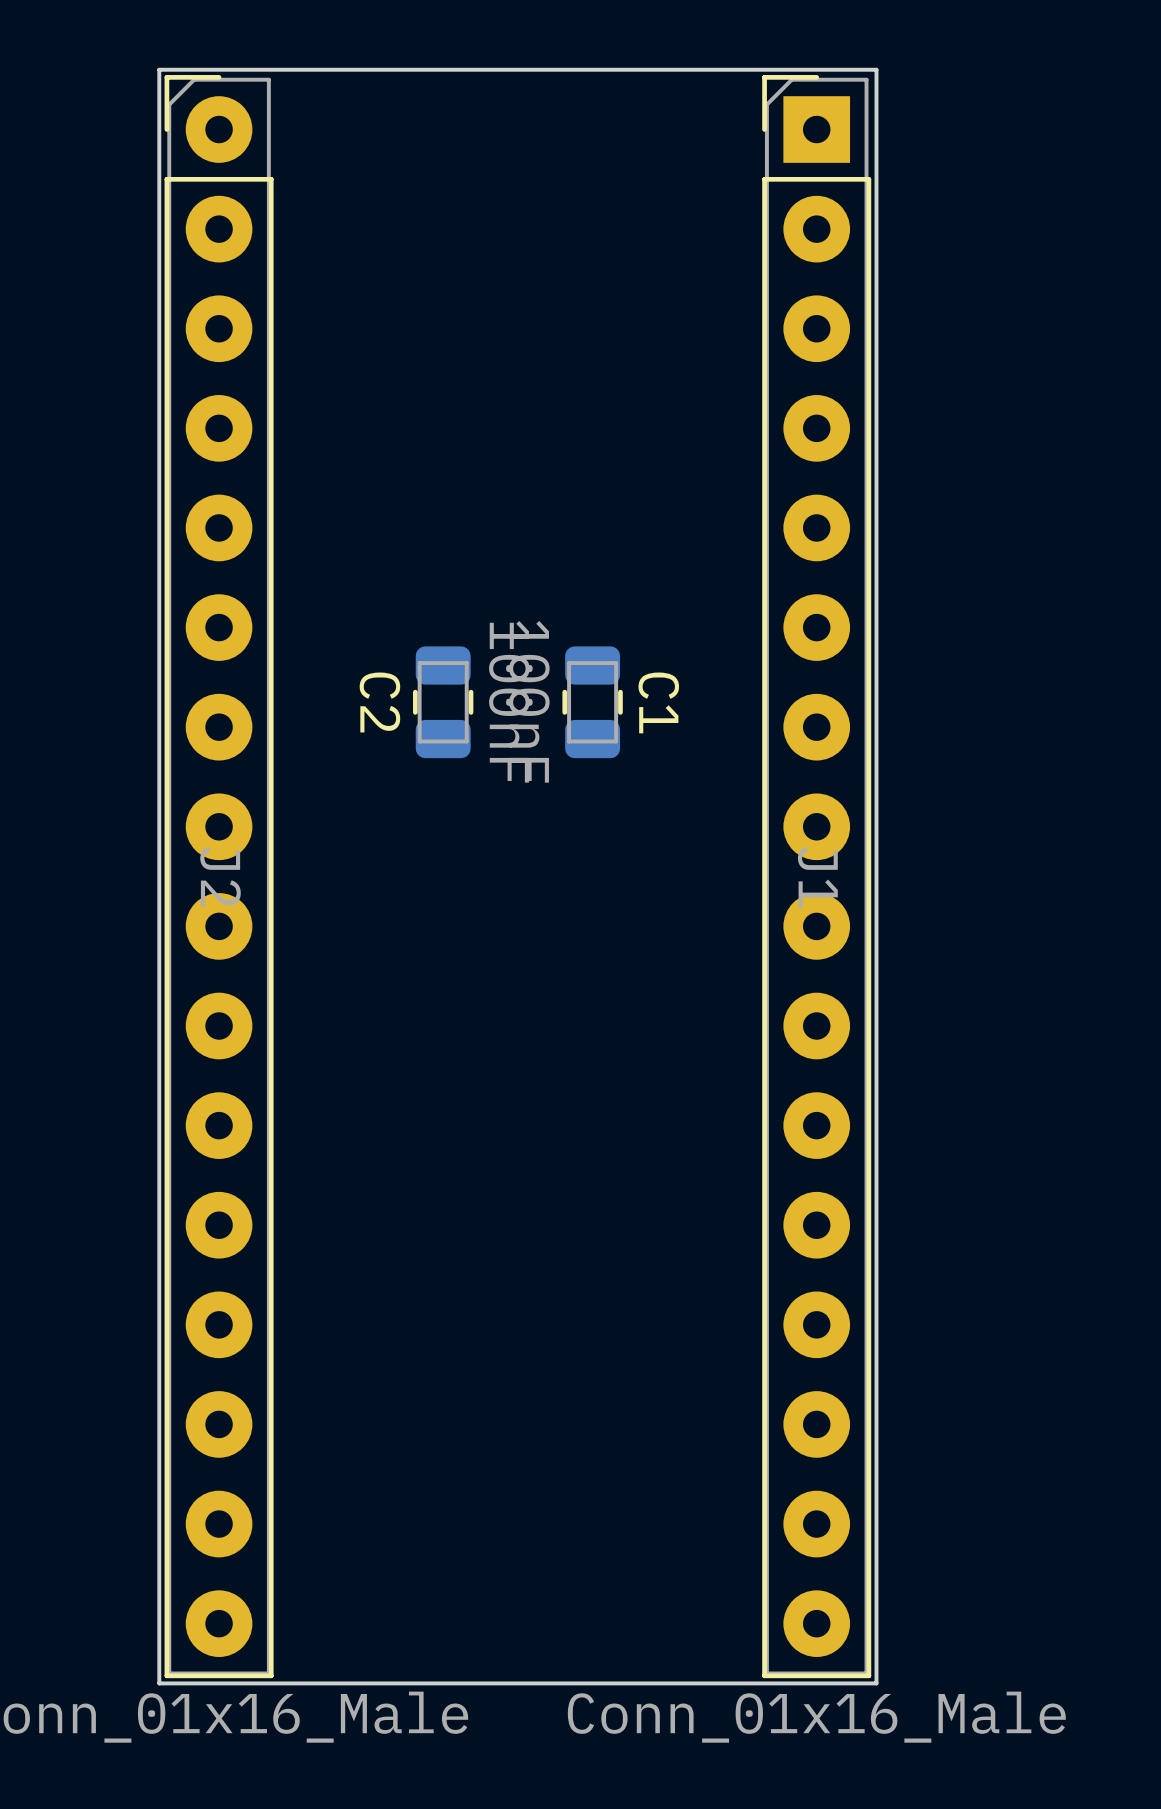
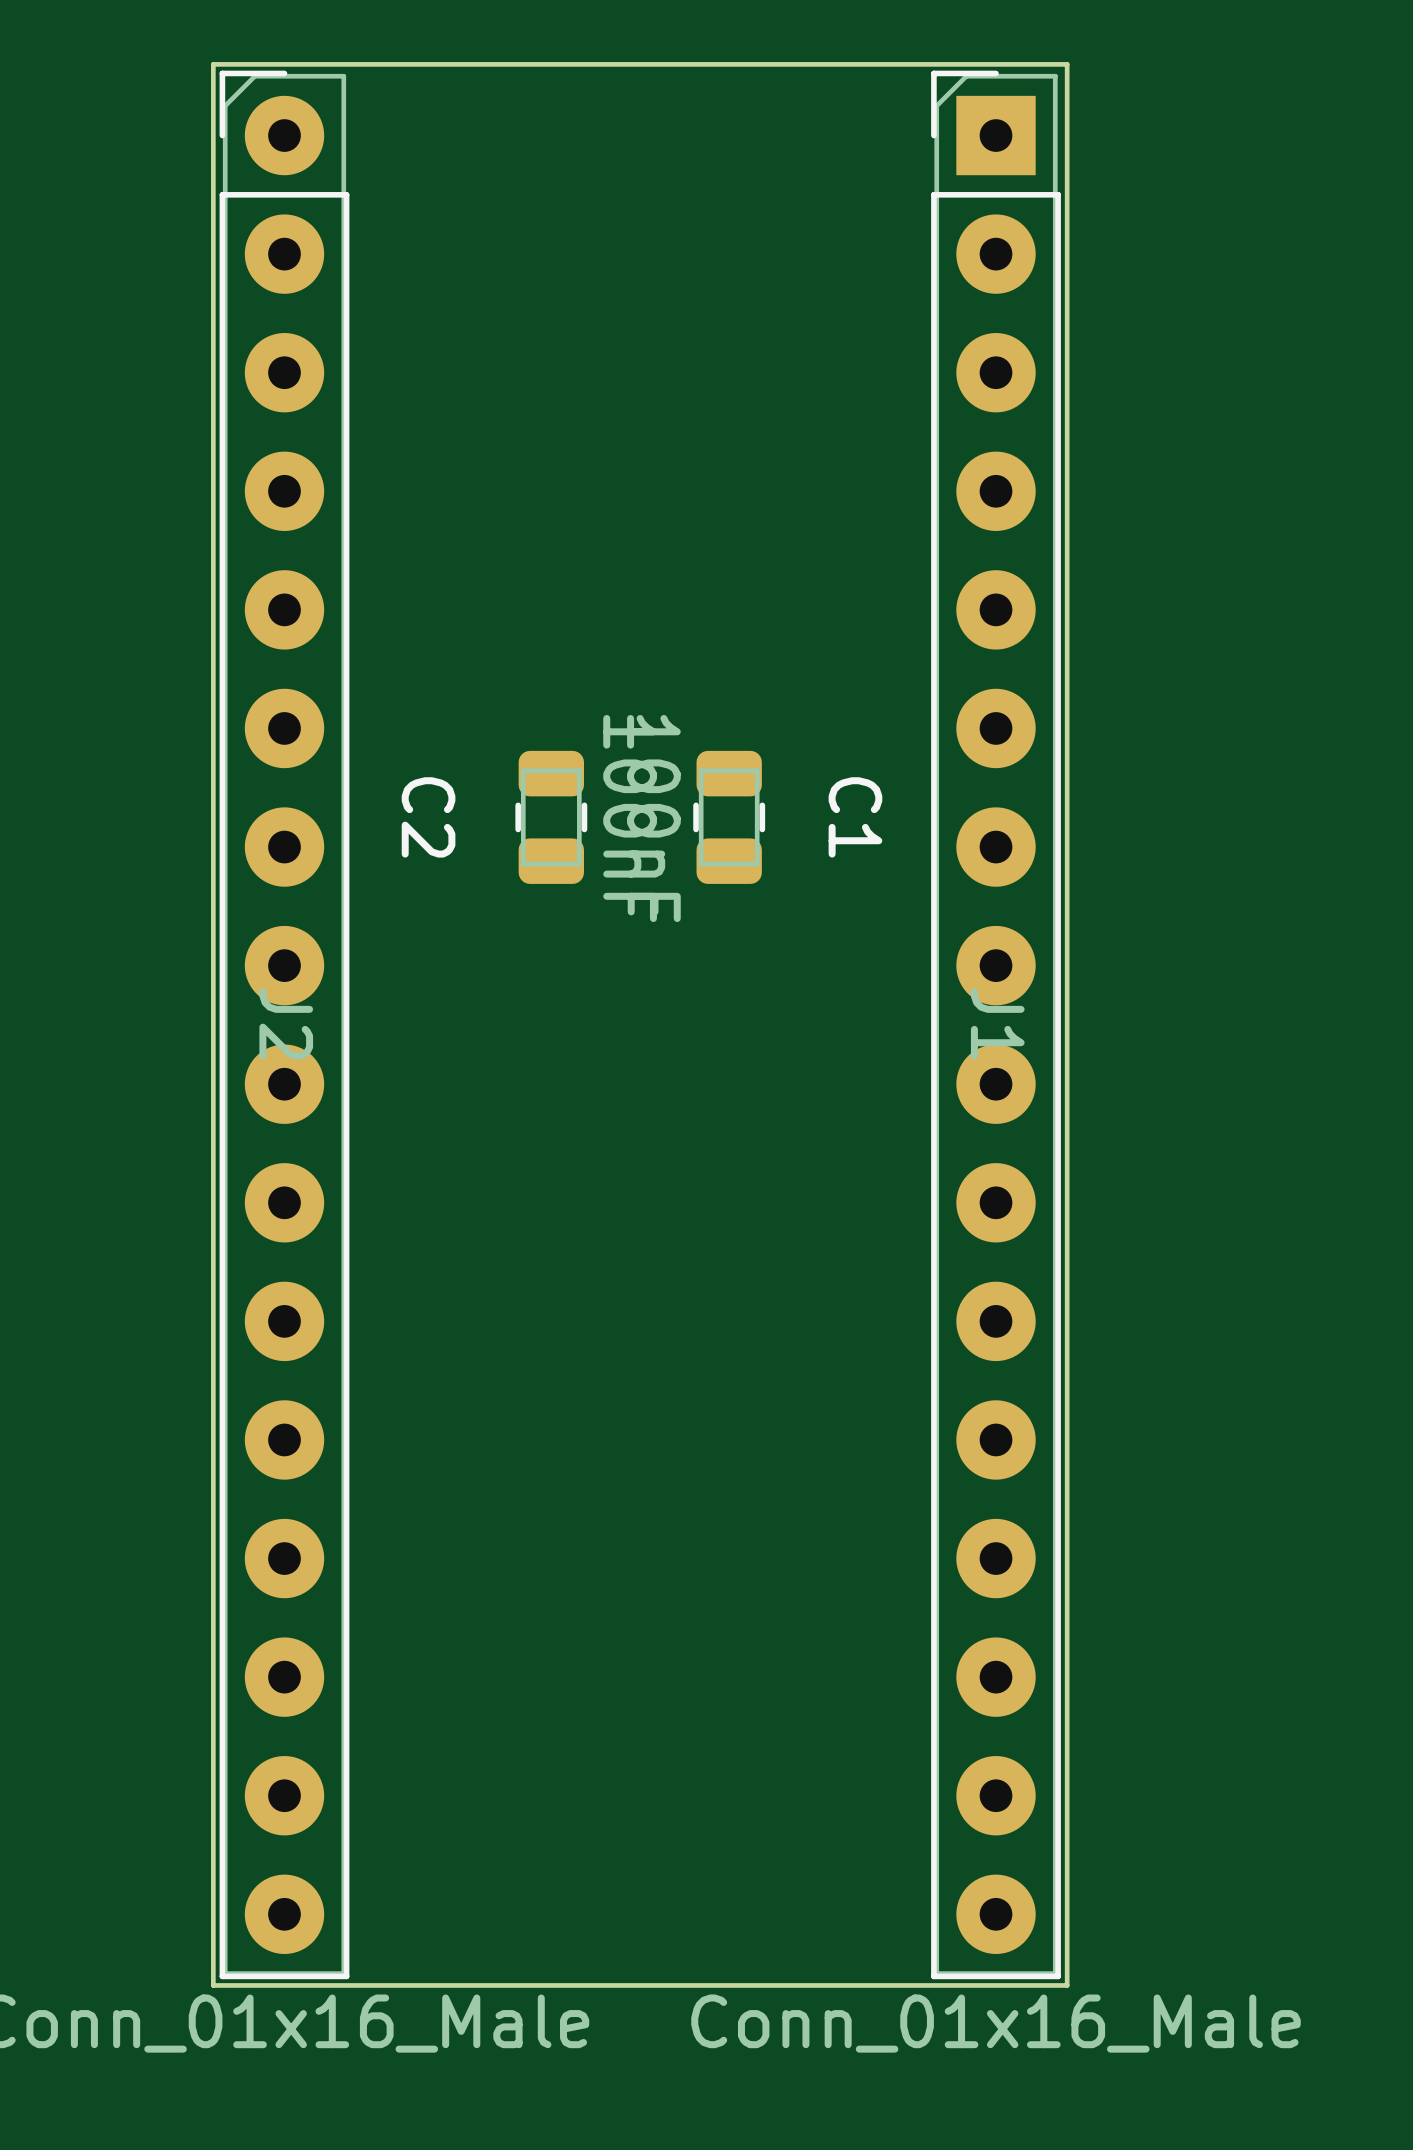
C2 name position: C2 (379, 702) -> C2 (428, 817)
C1 name position: C1 (658, 702) -> C1 (855, 817)

